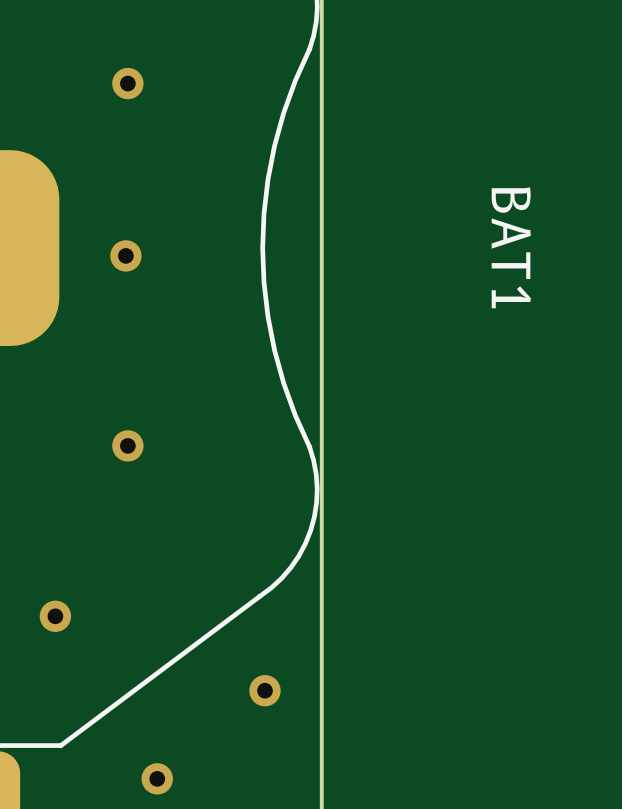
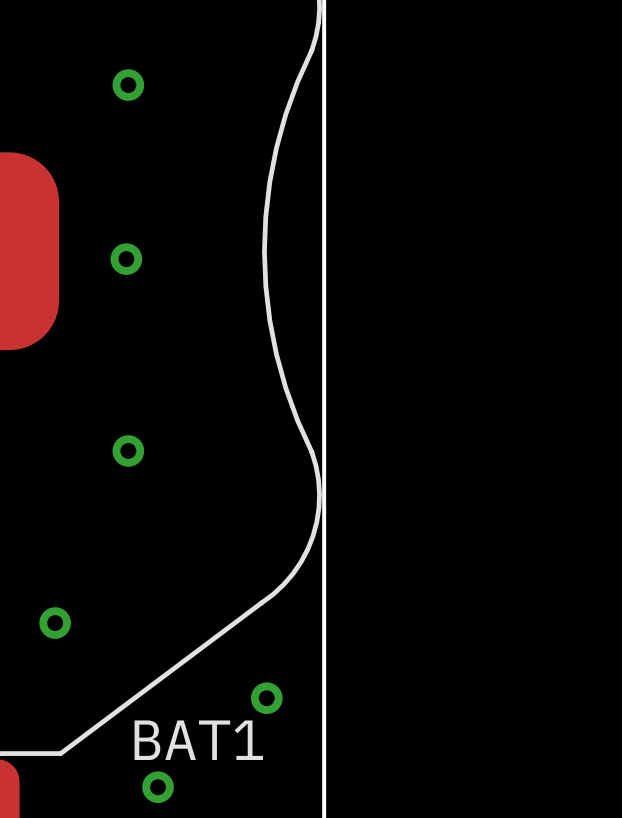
BAT1 name rotation: 0° (511, 247) -> 90° counterclockwise (198, 740)
BAT1 name position: BAT1 (511, 247) -> BAT1 (198, 740)

